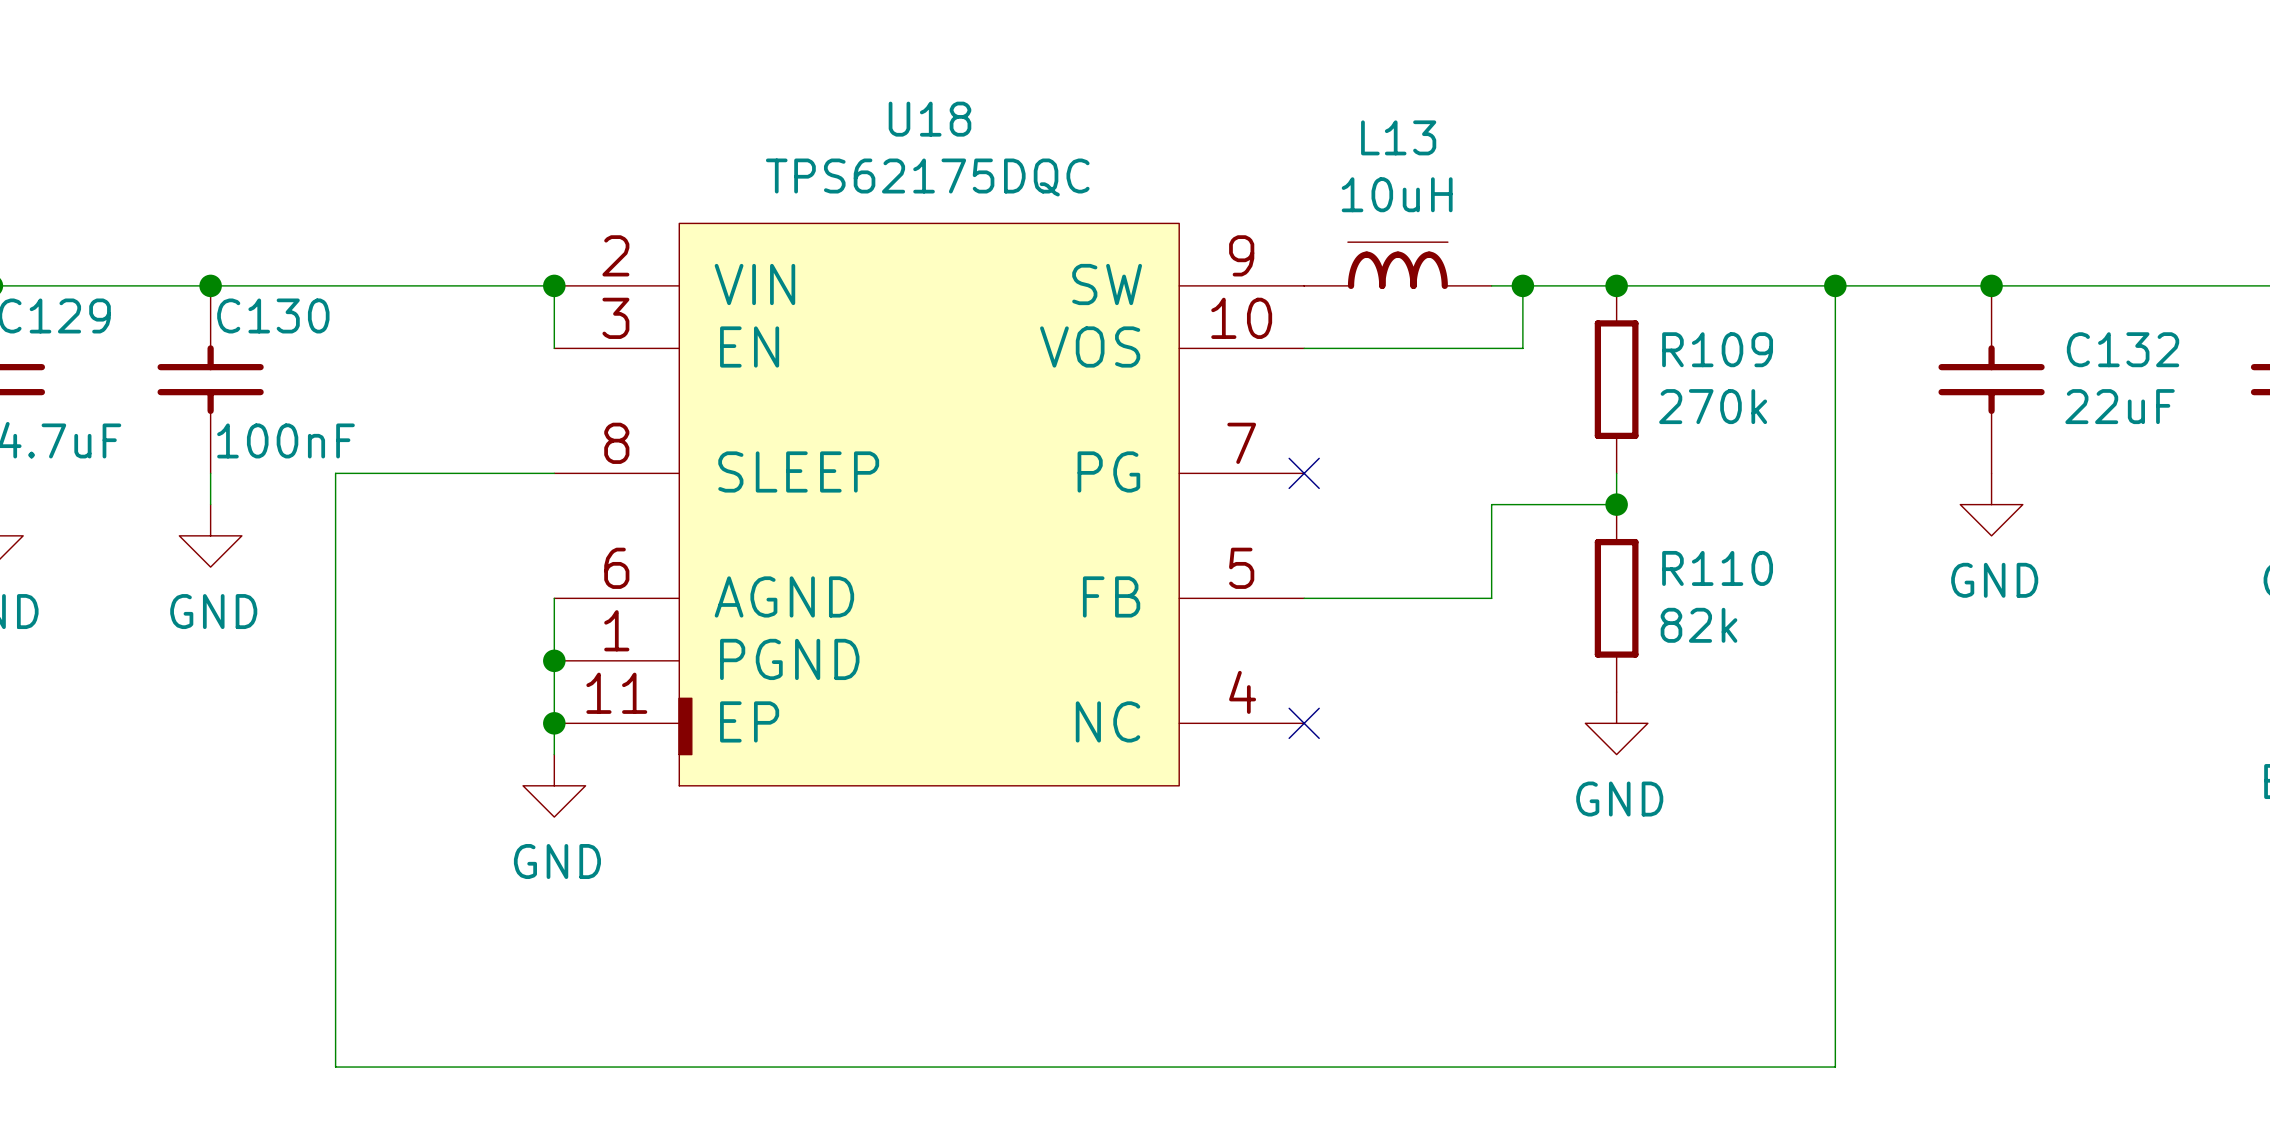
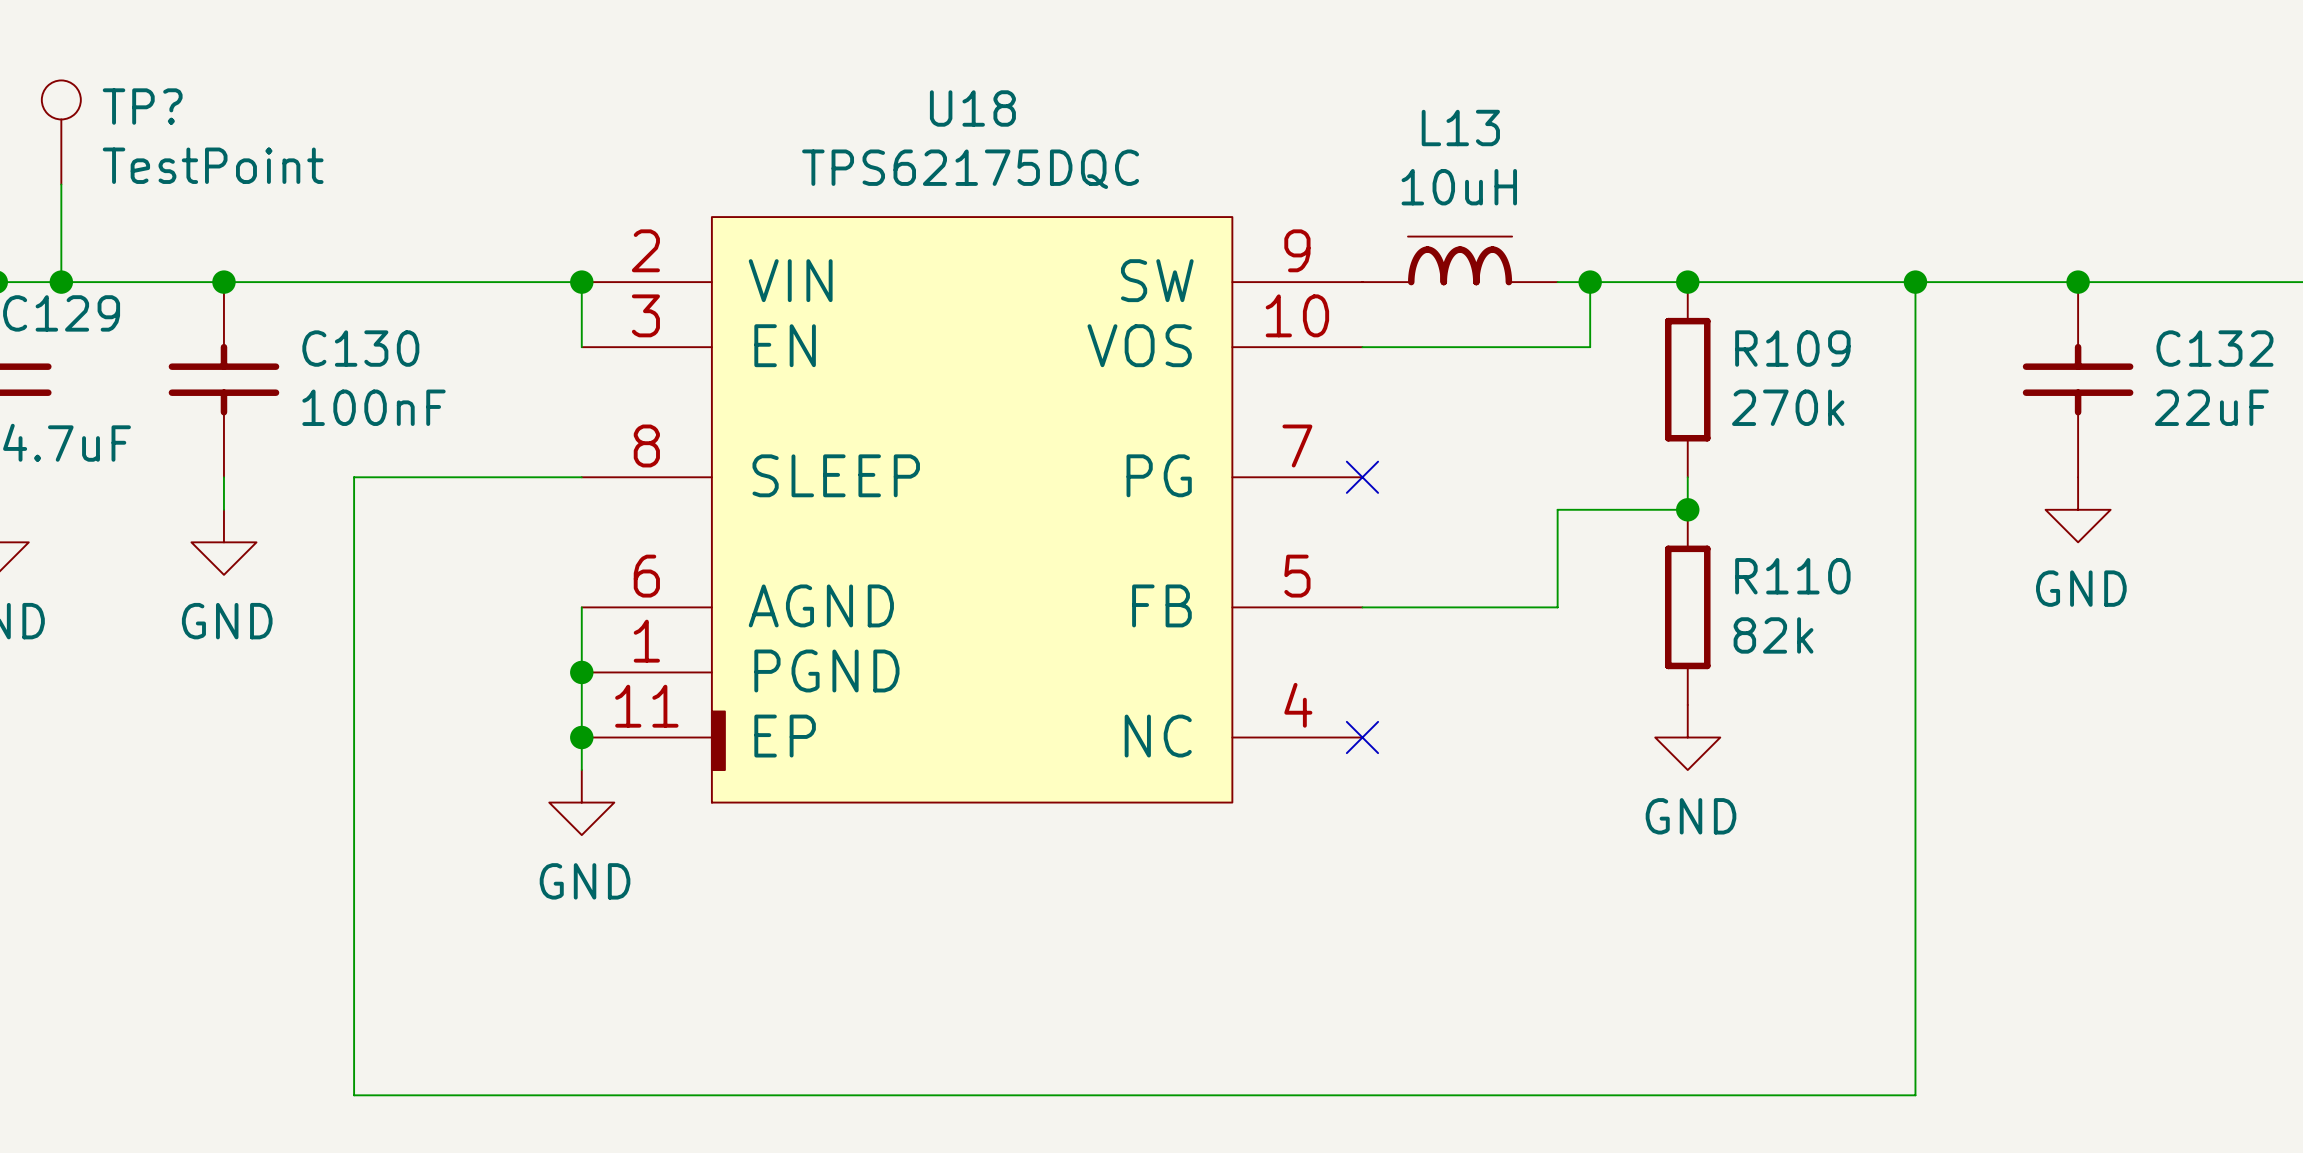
TP?: none -> TestPoint (61, 132)
wire: none -> (61, 184) (61, 282)
junction: none -> (61, 282)
C130 name position: C130 (273, 315) -> C130 (360, 348)
C130 text: none -> 100nF (374, 407)
C130 text: 100nF (285, 440) -> none

